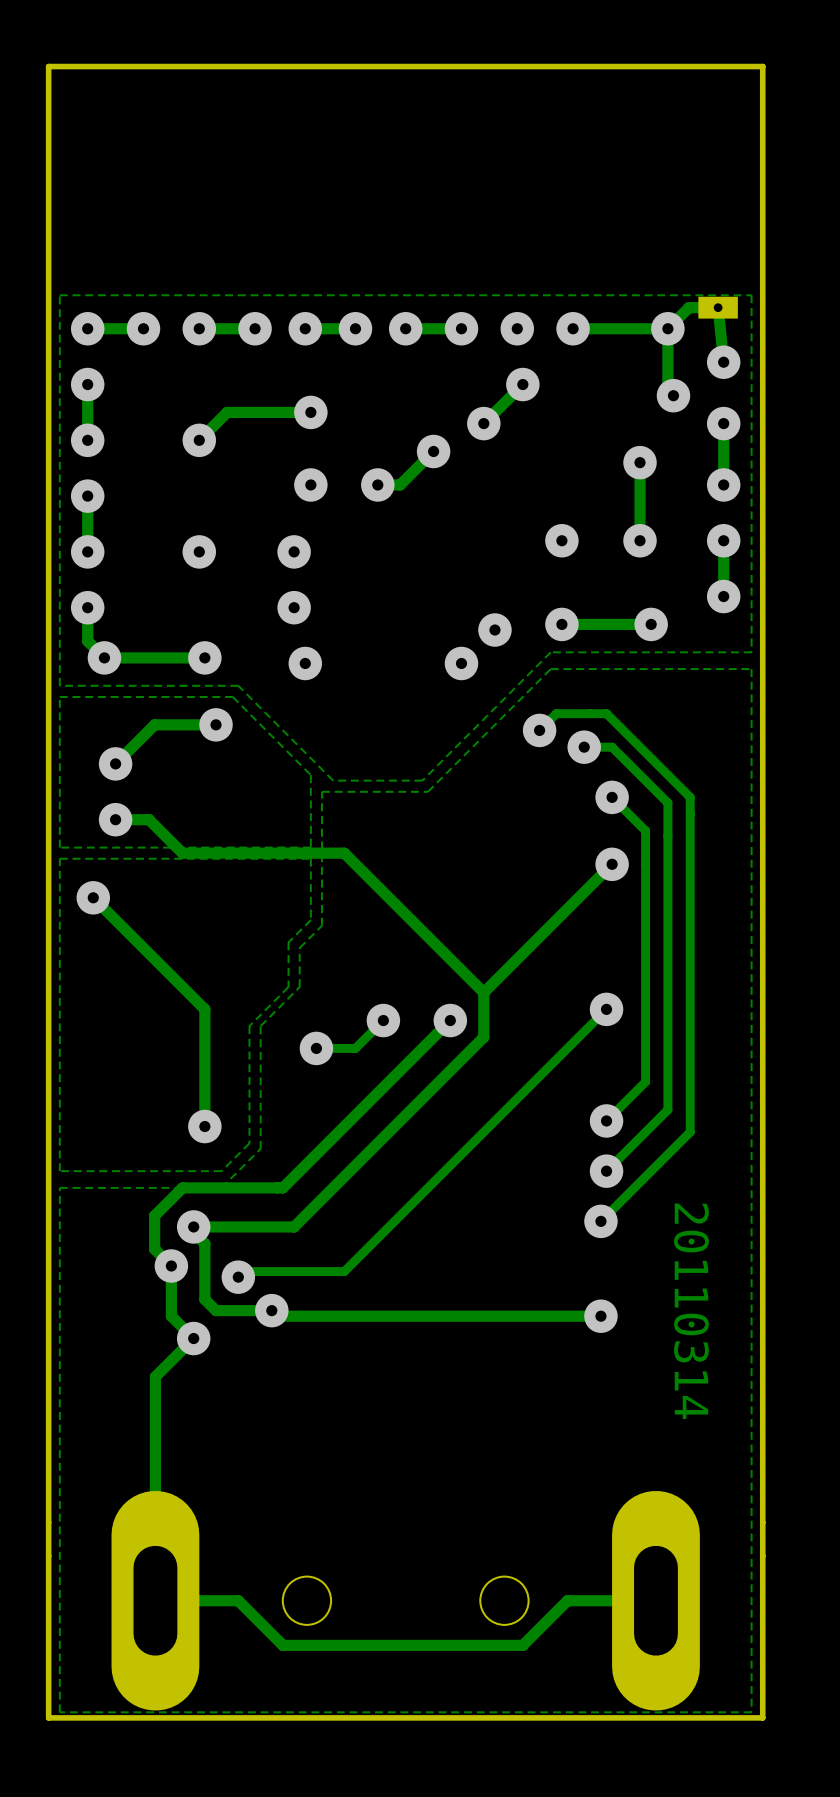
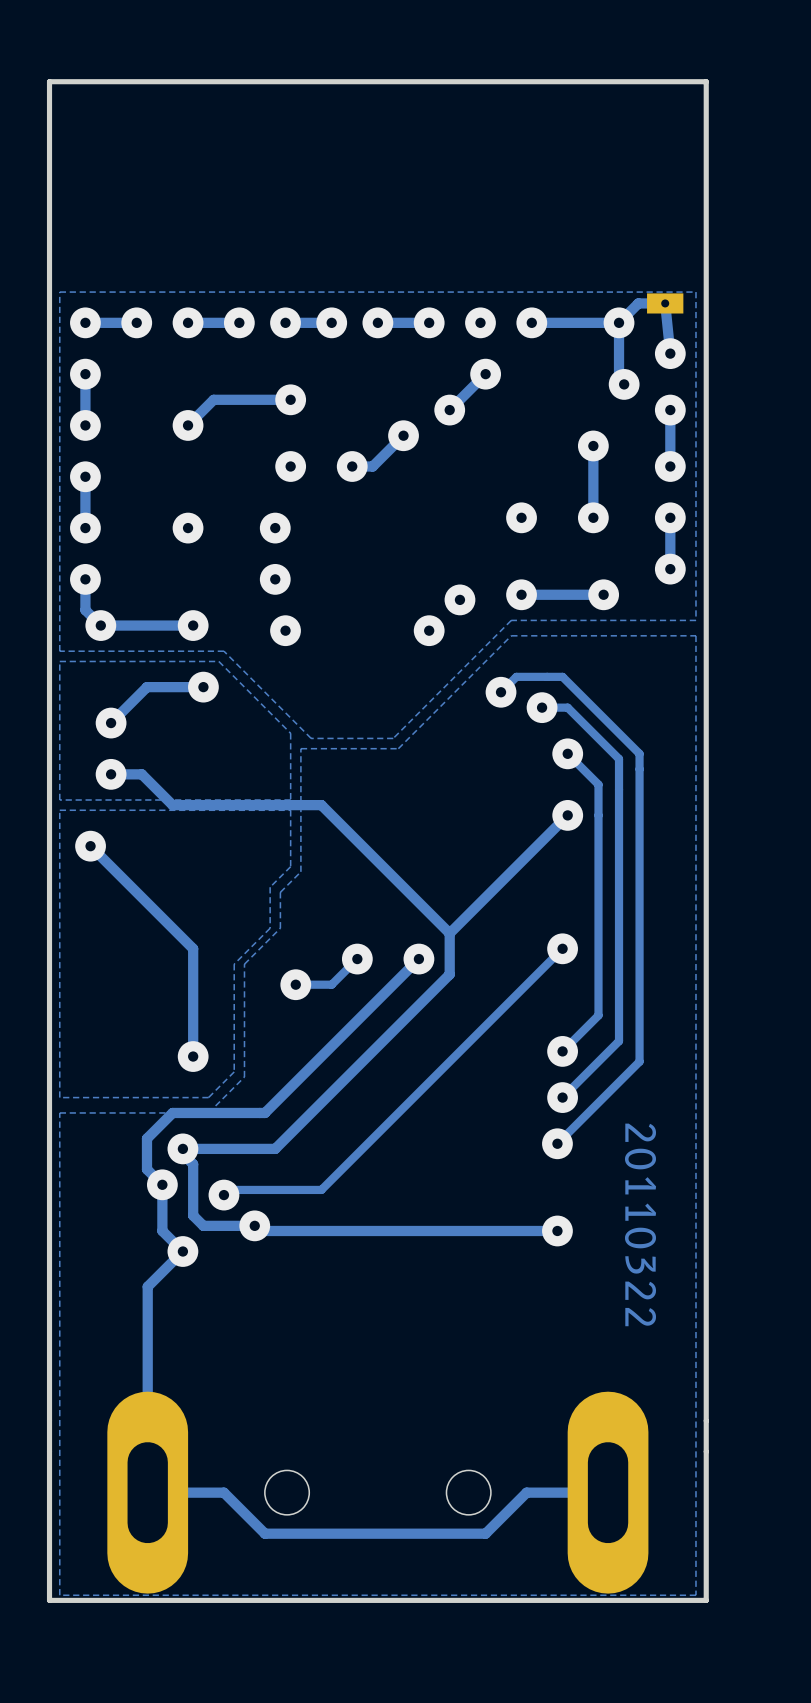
text: 20110314 (691, 1311) -> 20110322 (640, 1224)

